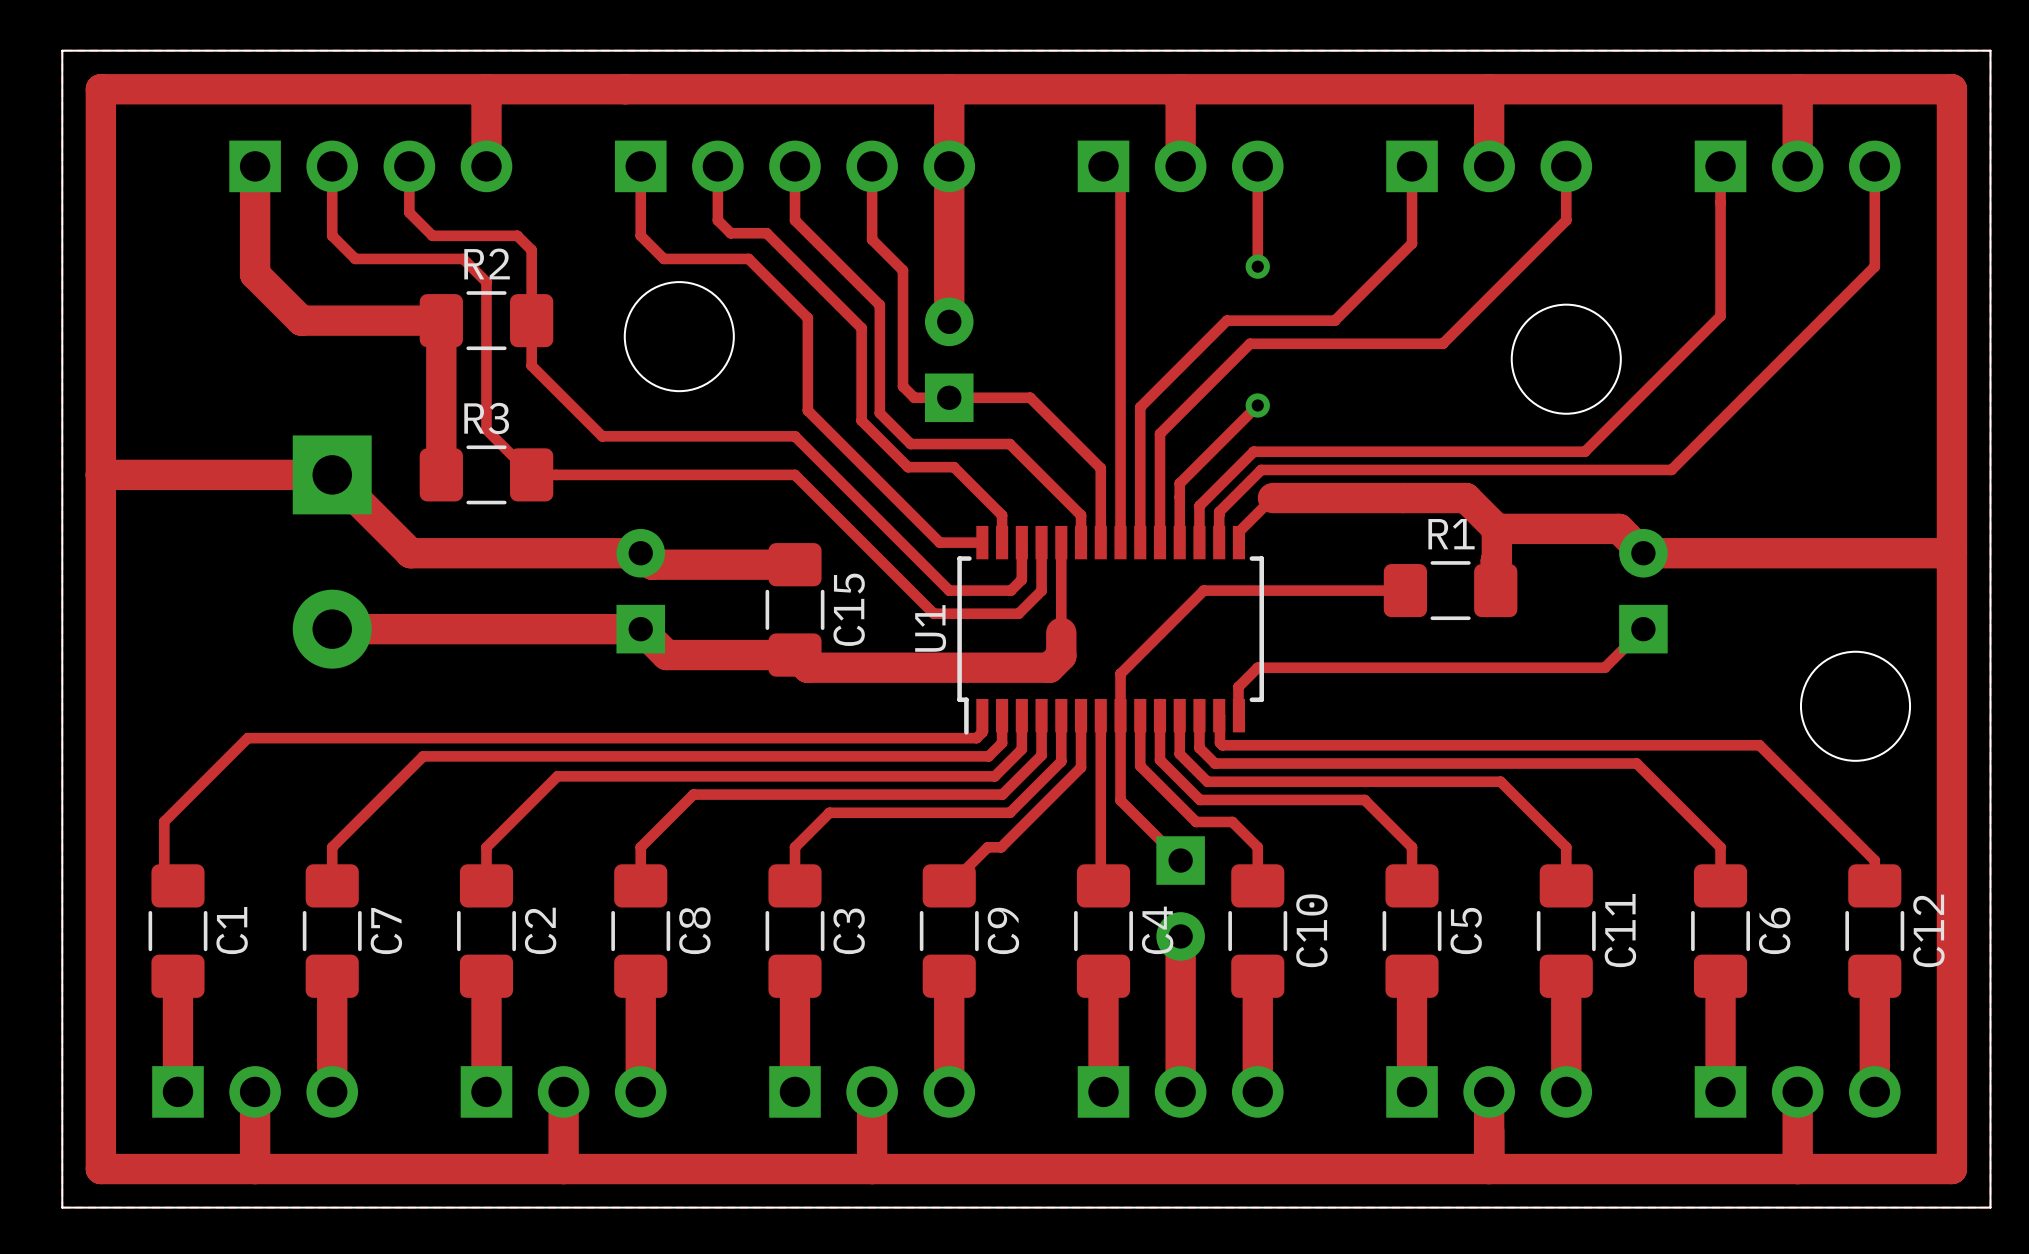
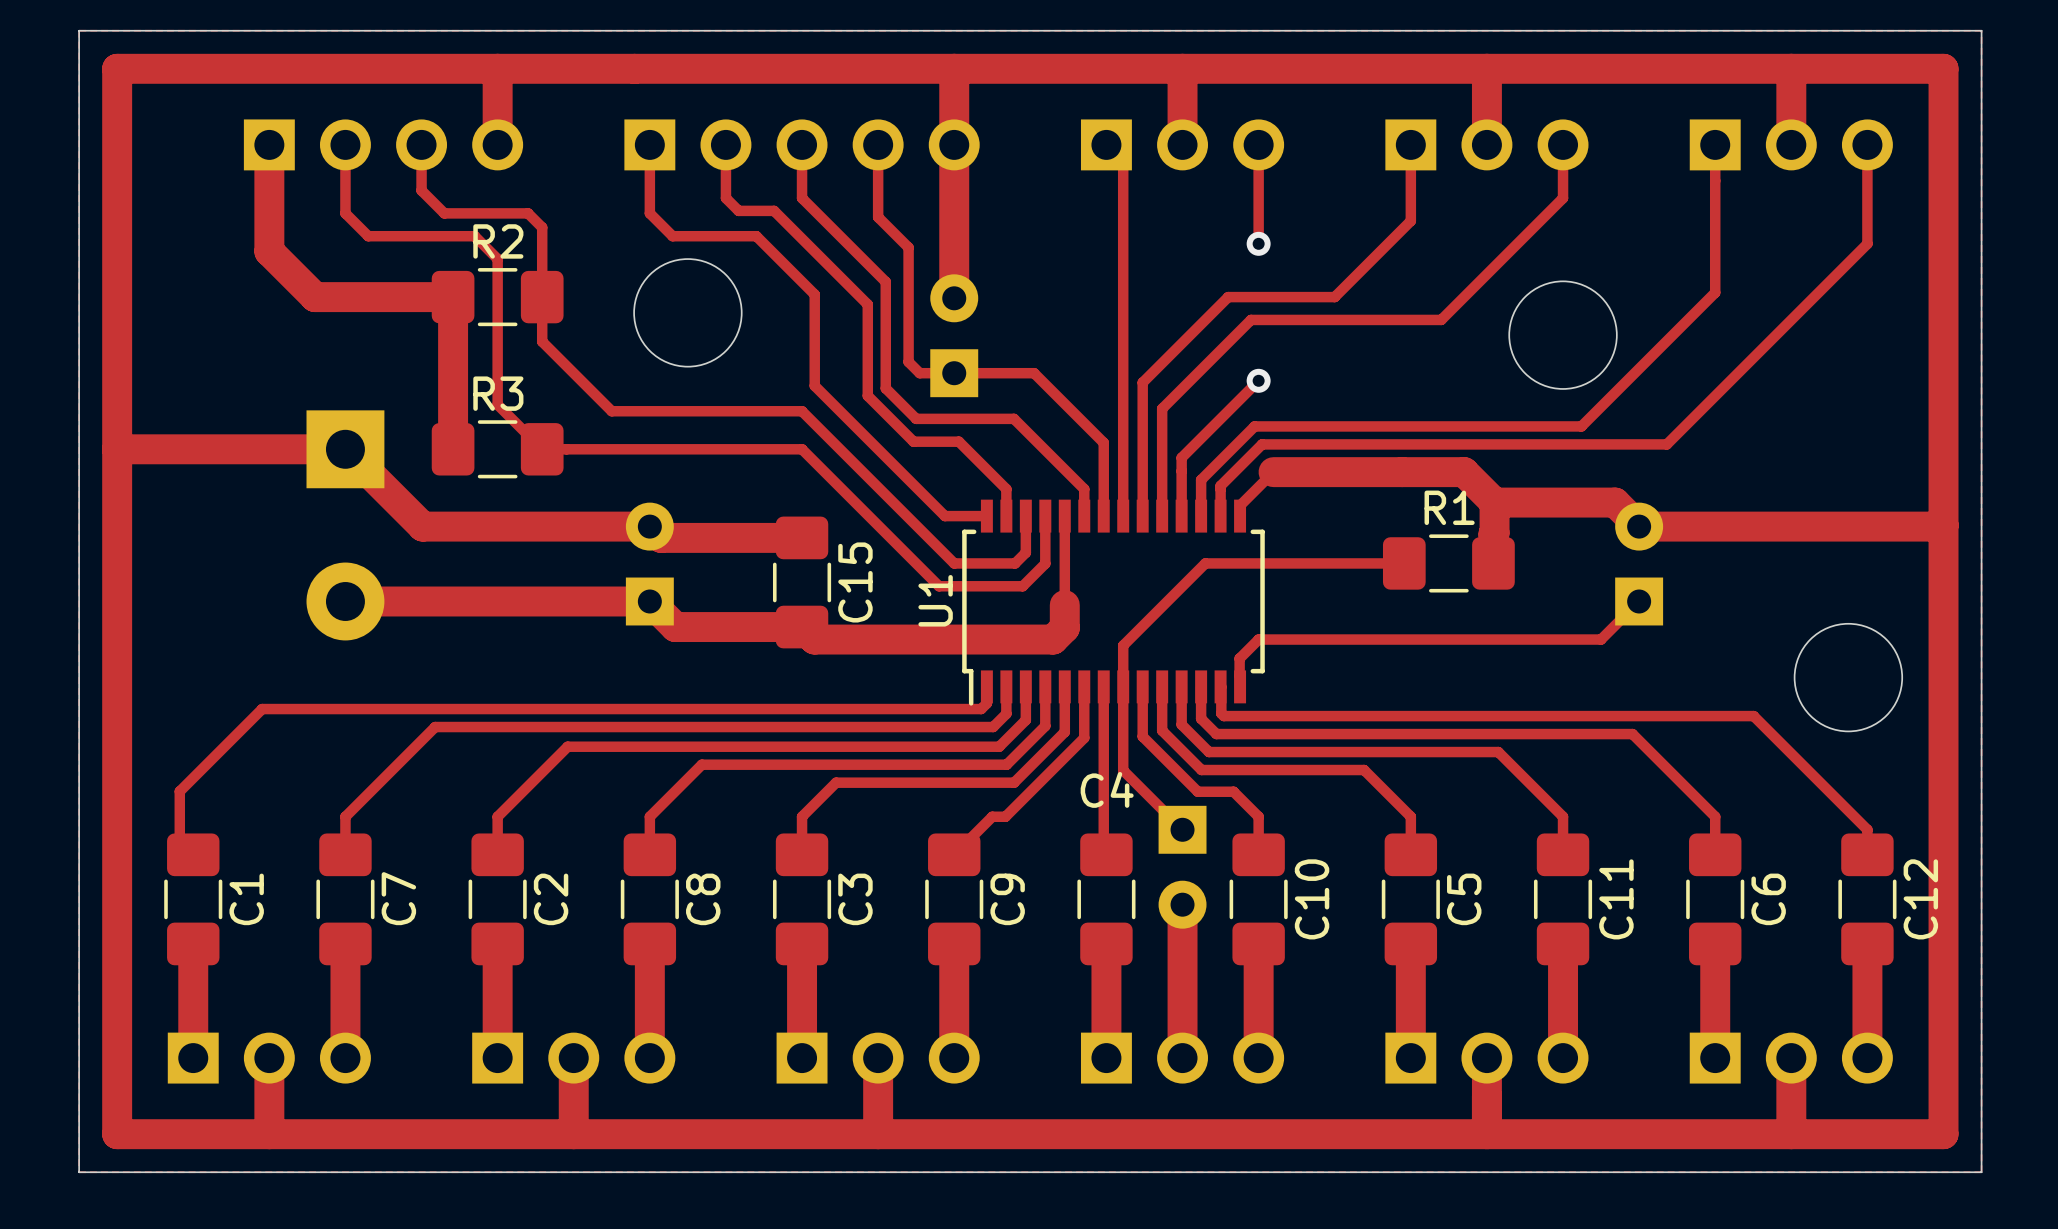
C4 name rotation: 0° (1157, 930) -> 90° clockwise (1107, 789)
C4 name position: C4 (1157, 930) -> C4 (1107, 789)

